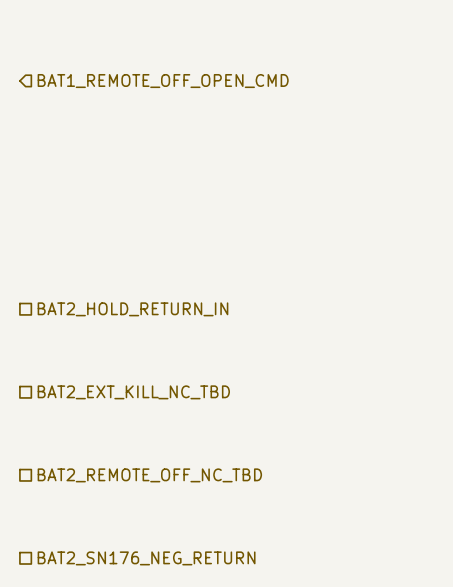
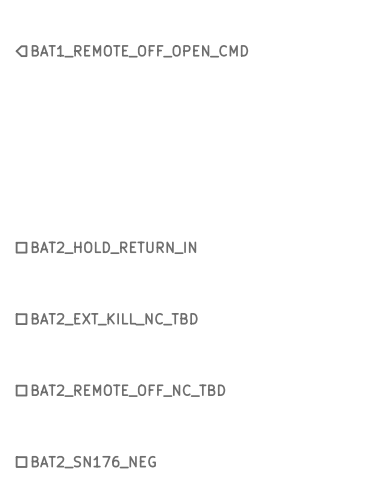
hierarchical label: BAT2_SN176_NEG_RETURN (146, 558) -> BAT2_SN176_NEG (93, 462)

